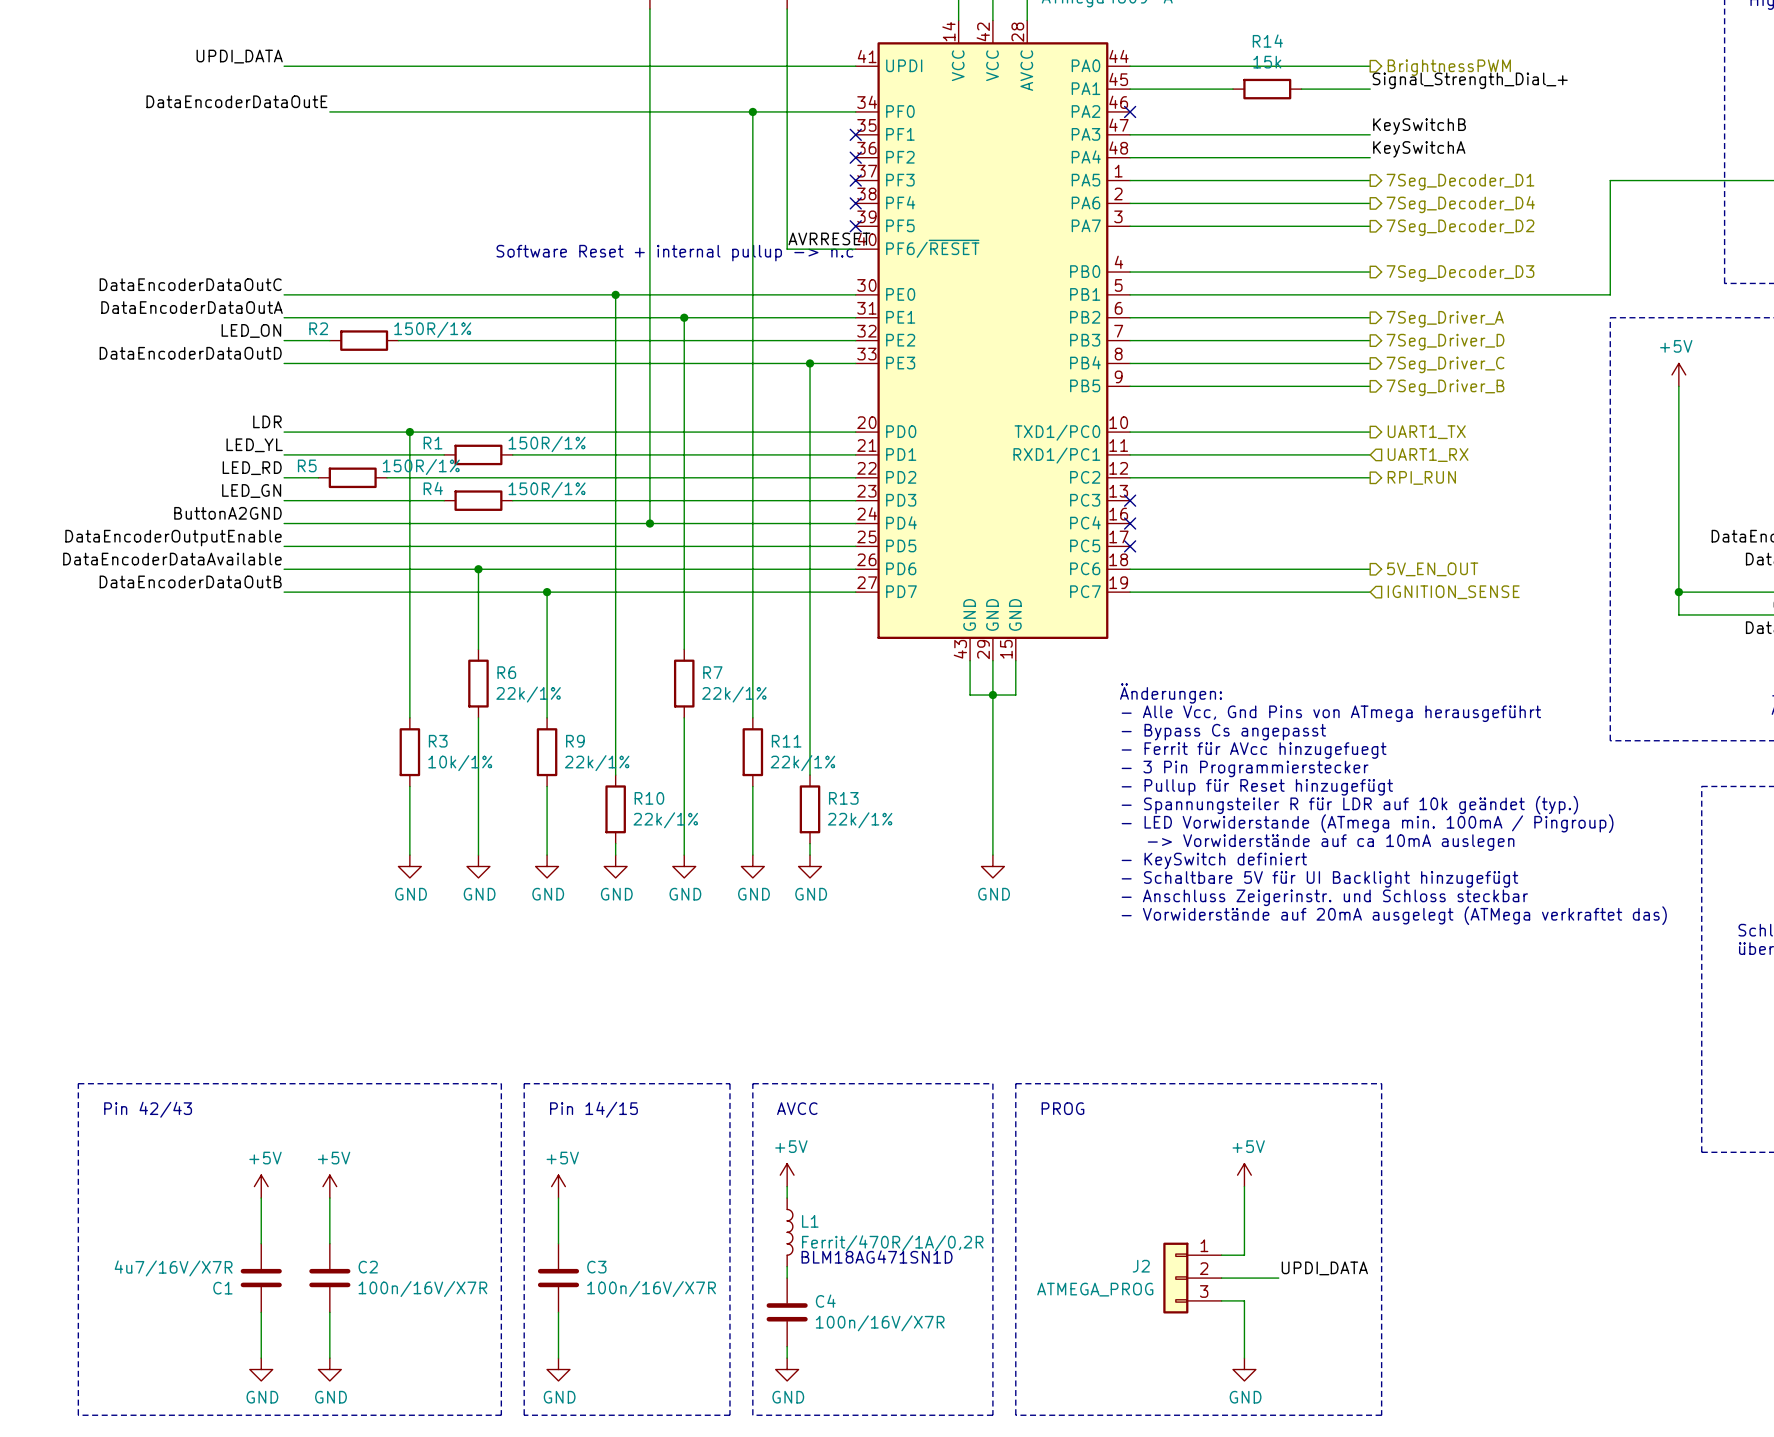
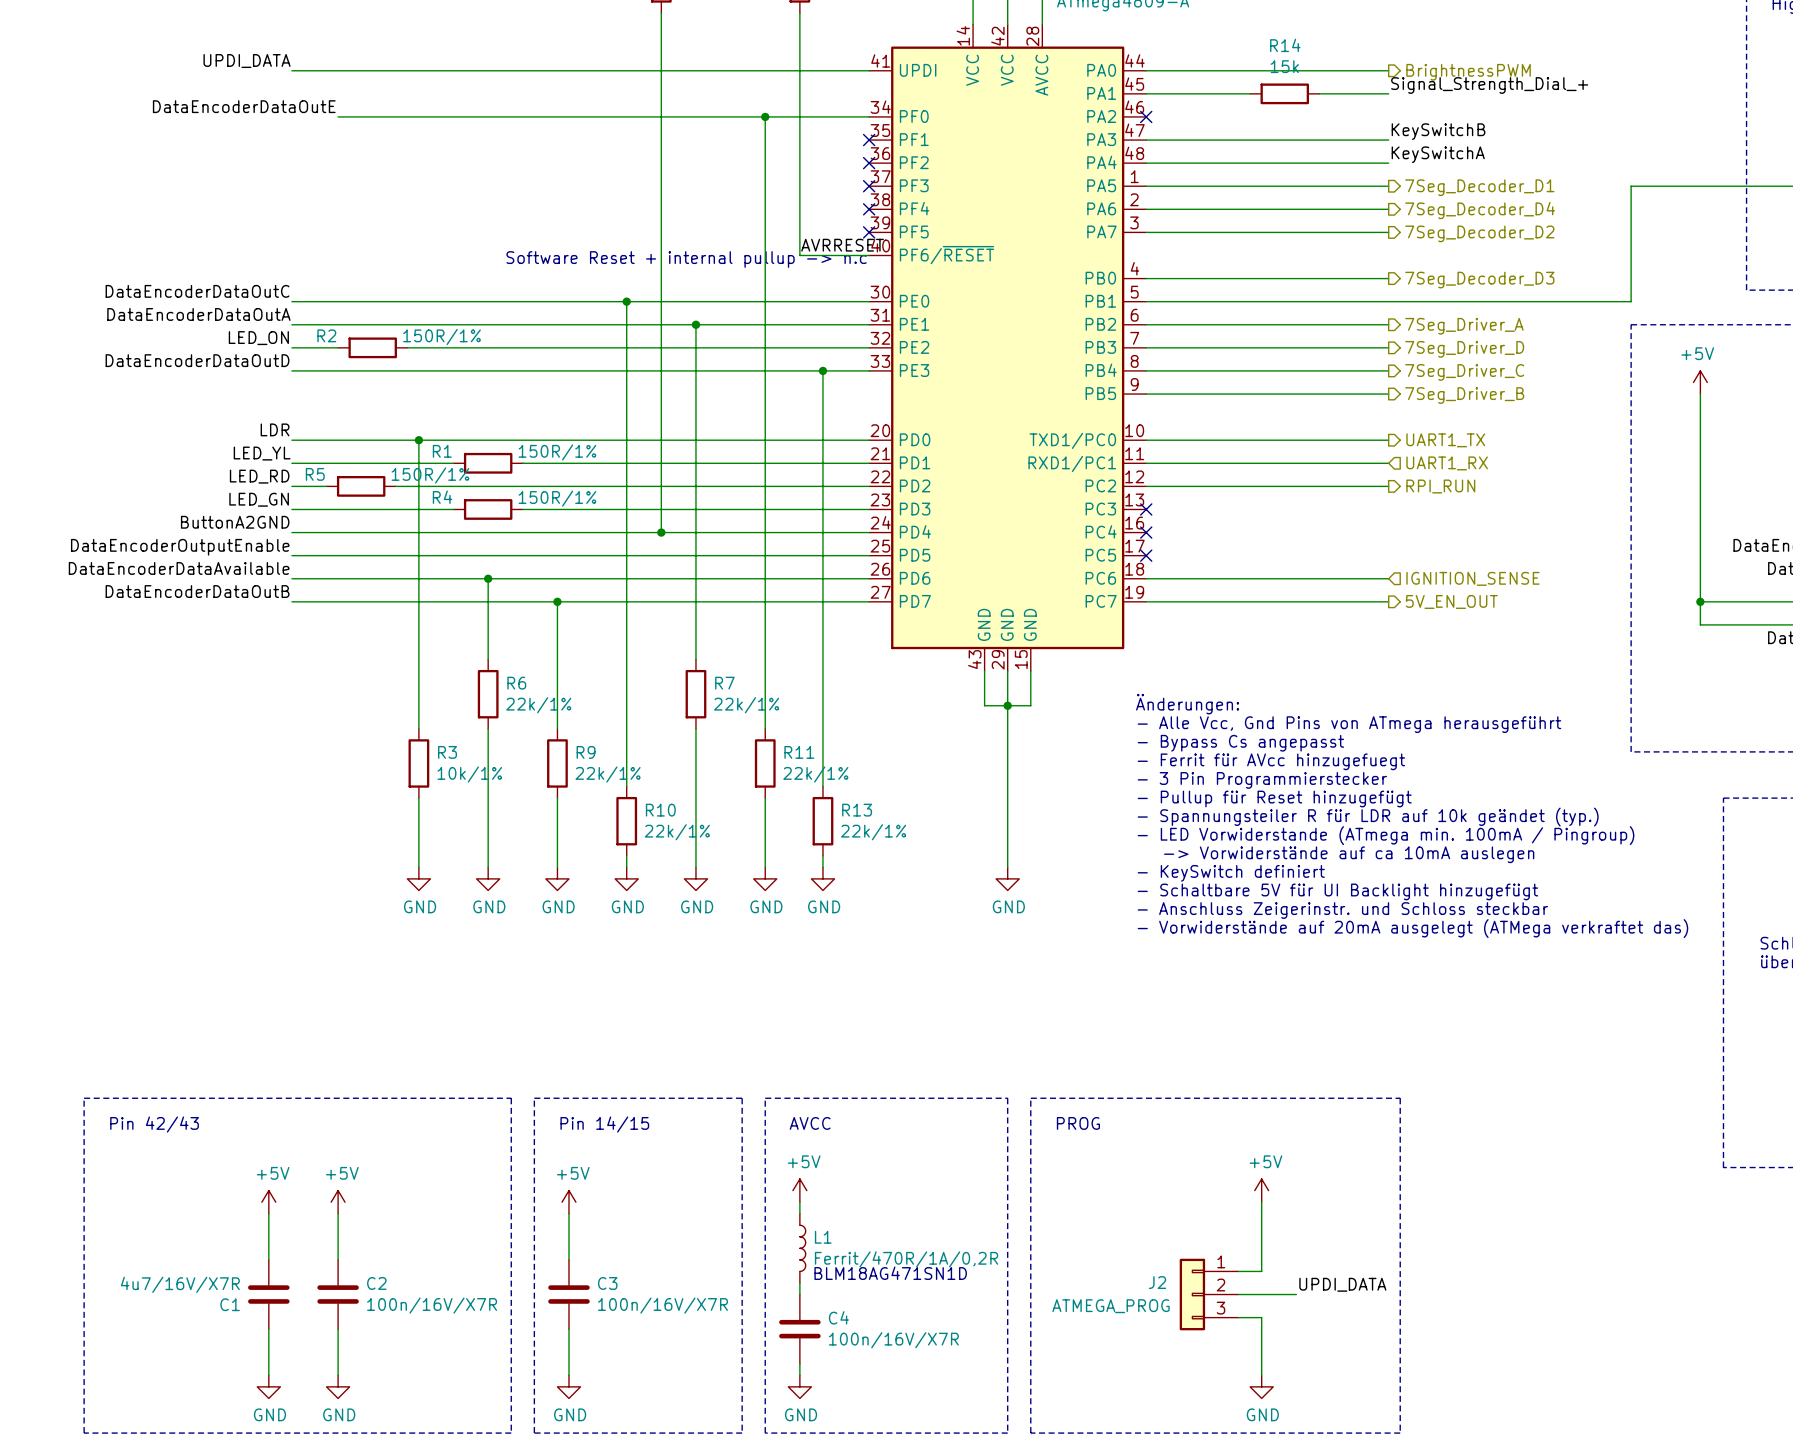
hierarchical label shape: output (1432, 569) -> input (1472, 578)
hierarchical label: 5V_EN_OUT (1432, 569) -> IGNITION_SENSE (1472, 578)
hierarchical label shape: input (1453, 592) -> output (1451, 601)
hierarchical label: IGNITION_SENSE (1453, 592) -> 5V_EN_OUT (1451, 601)

